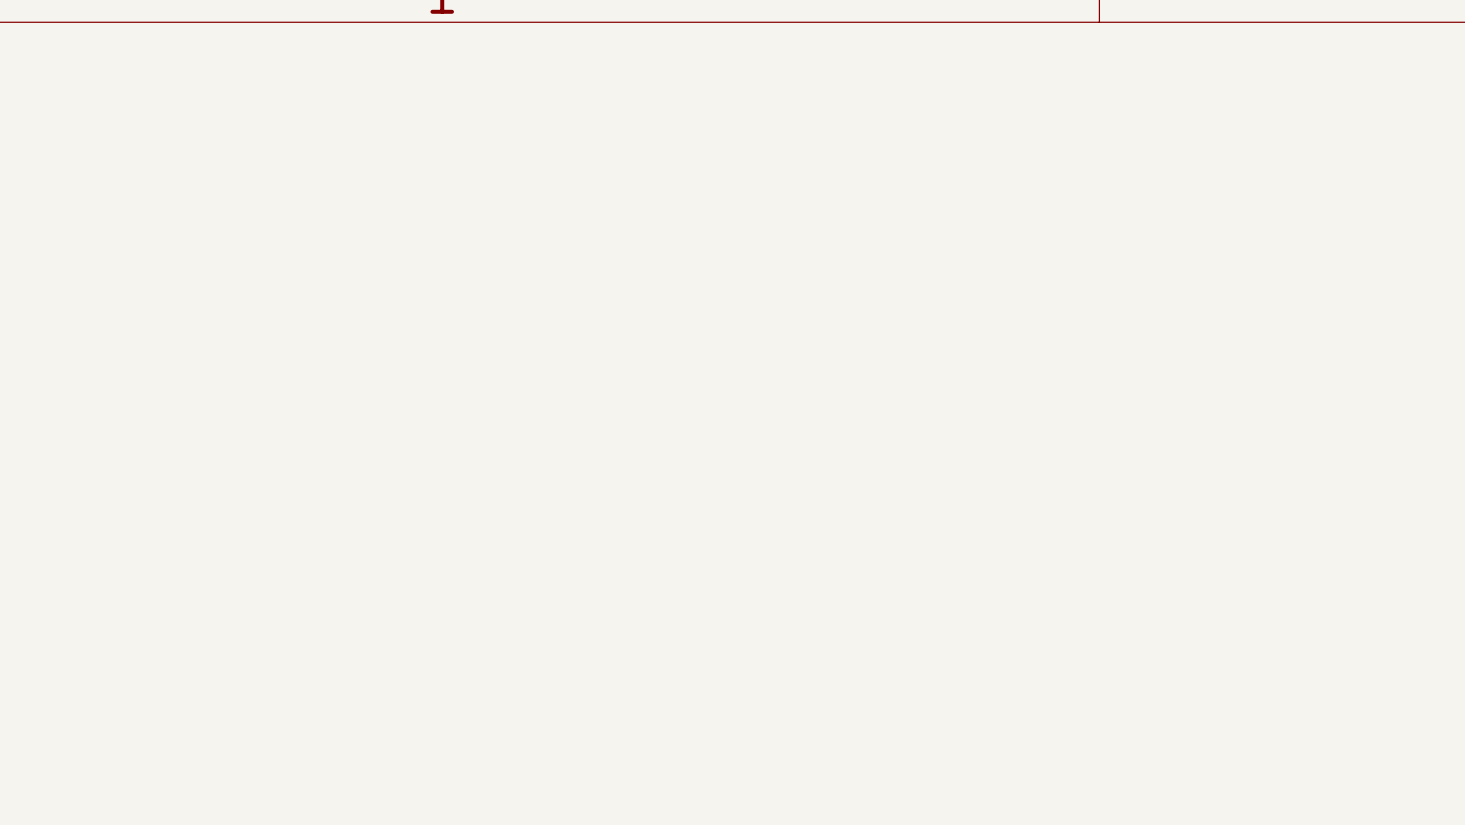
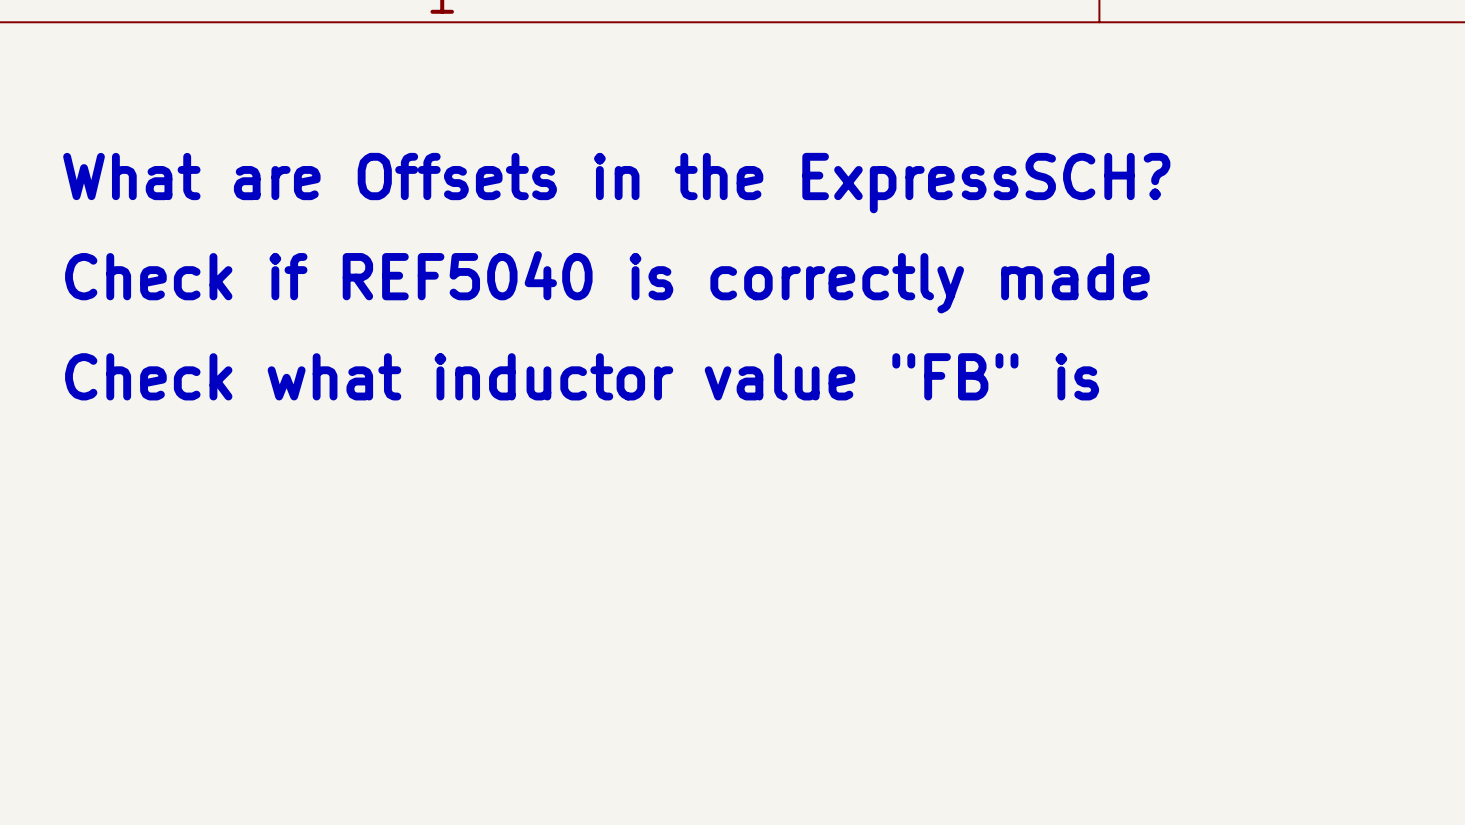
text: none -> What are Offsets in the ExpressSCH? (616, 183)
text: none -> Check if REF5040 is correctly made (607, 282)
text: none -> Check what inductor value "FB" is (582, 376)

